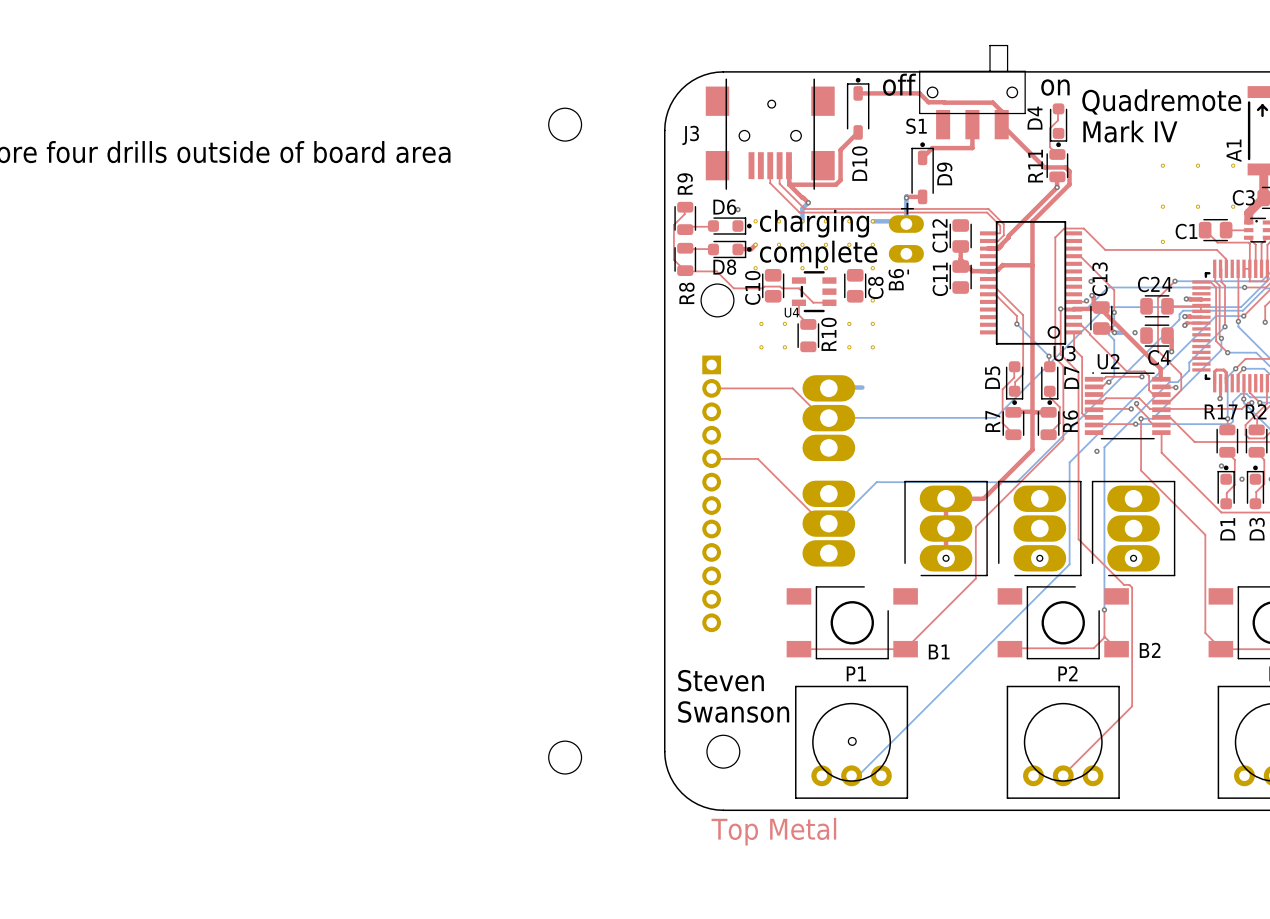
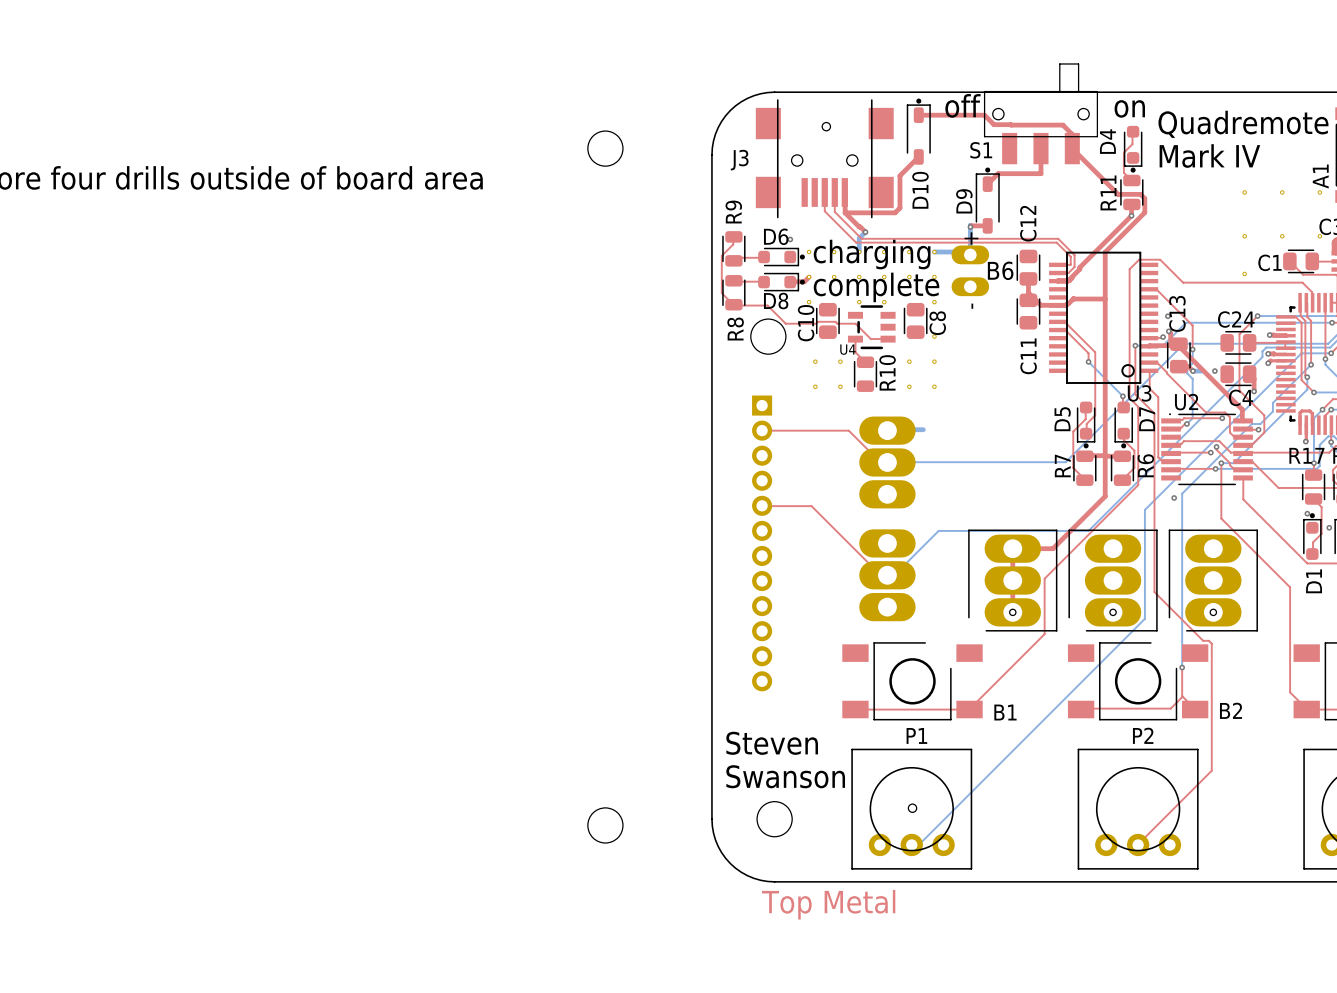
D9 name position: D9 (944, 173) -> D9 (964, 201)
C12 name position: C12 (940, 235) -> C12 (1028, 223)
B6 name rotation: 0° (896, 279) -> 90° clockwise (1000, 270)
B6 name position: B6 (896, 279) -> B6 (1000, 270)
C11 name position: C11 (940, 279) -> C11 (1028, 356)

